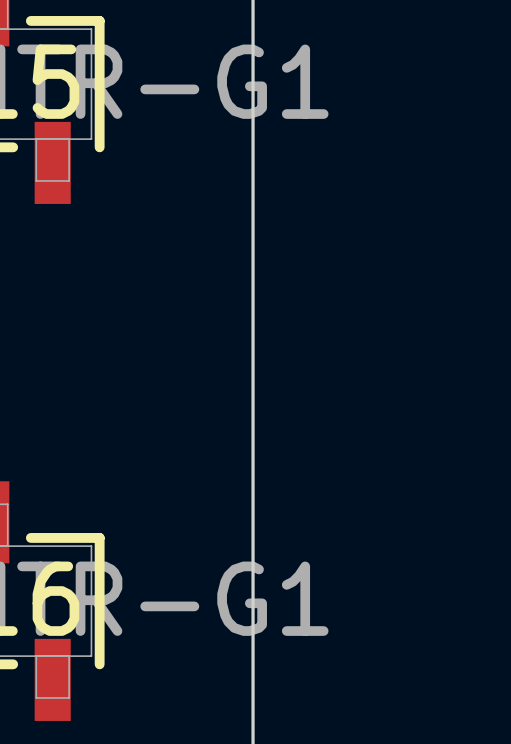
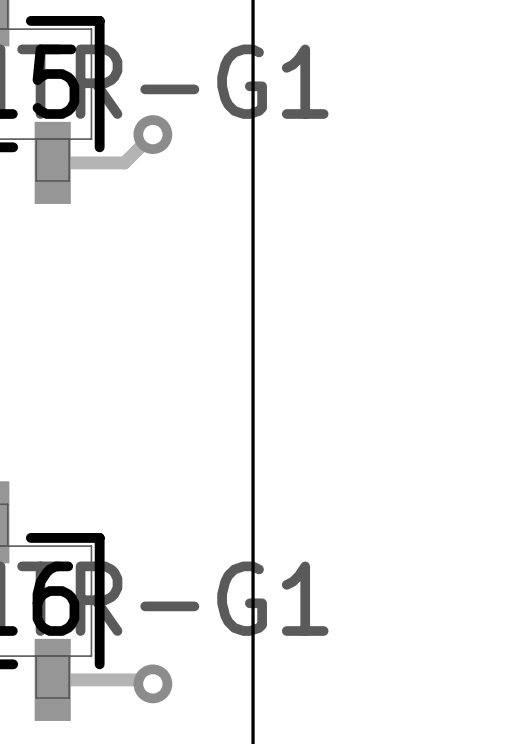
track: none -> (152, 134) (124, 162) (52, 162)
via: none -> (152, 134)
track: none -> (52, 679) (148, 679) (152, 683)
via: none -> (152, 683)

